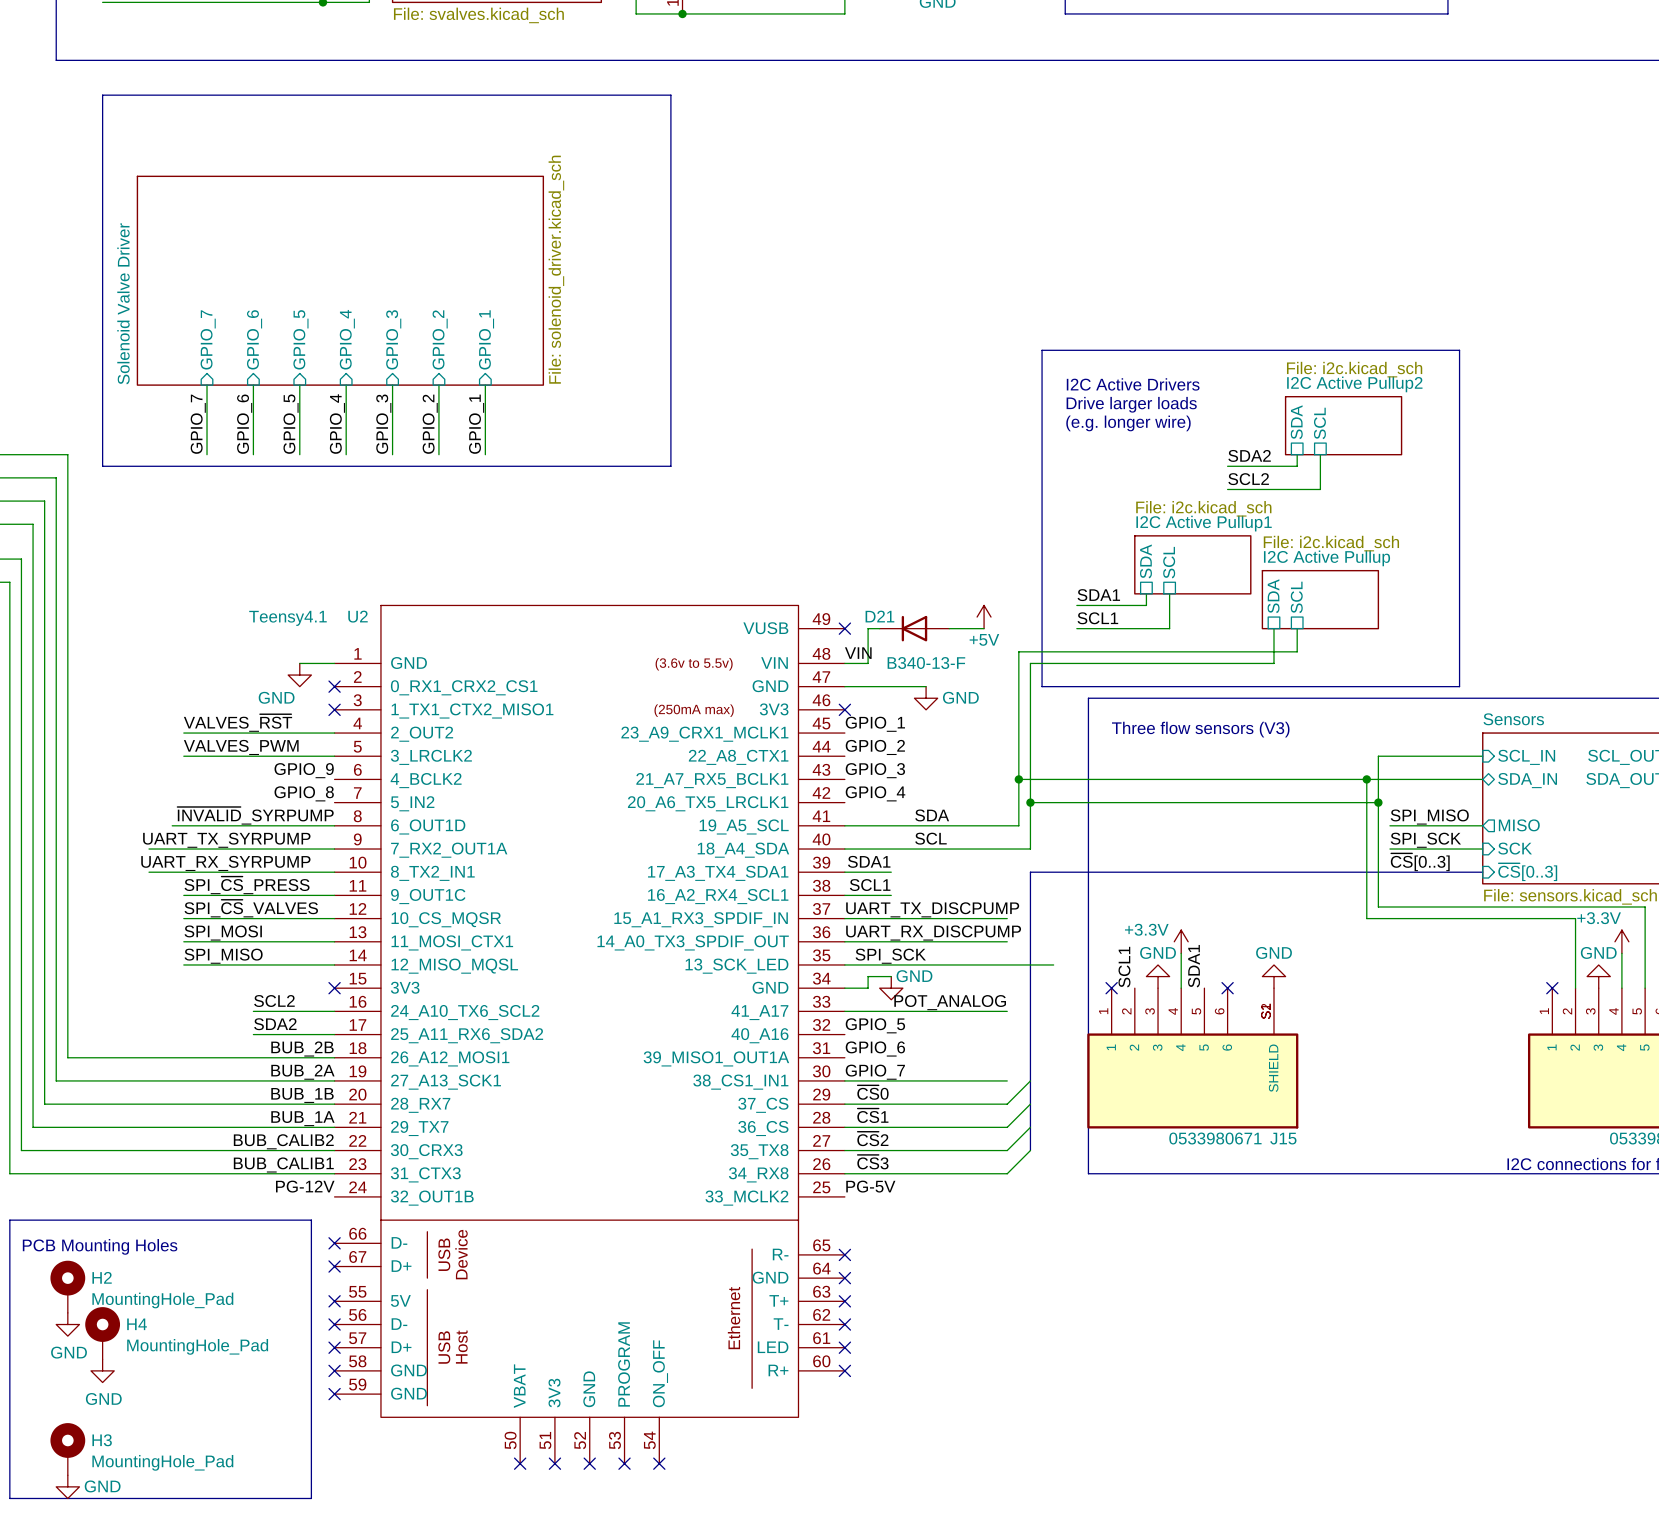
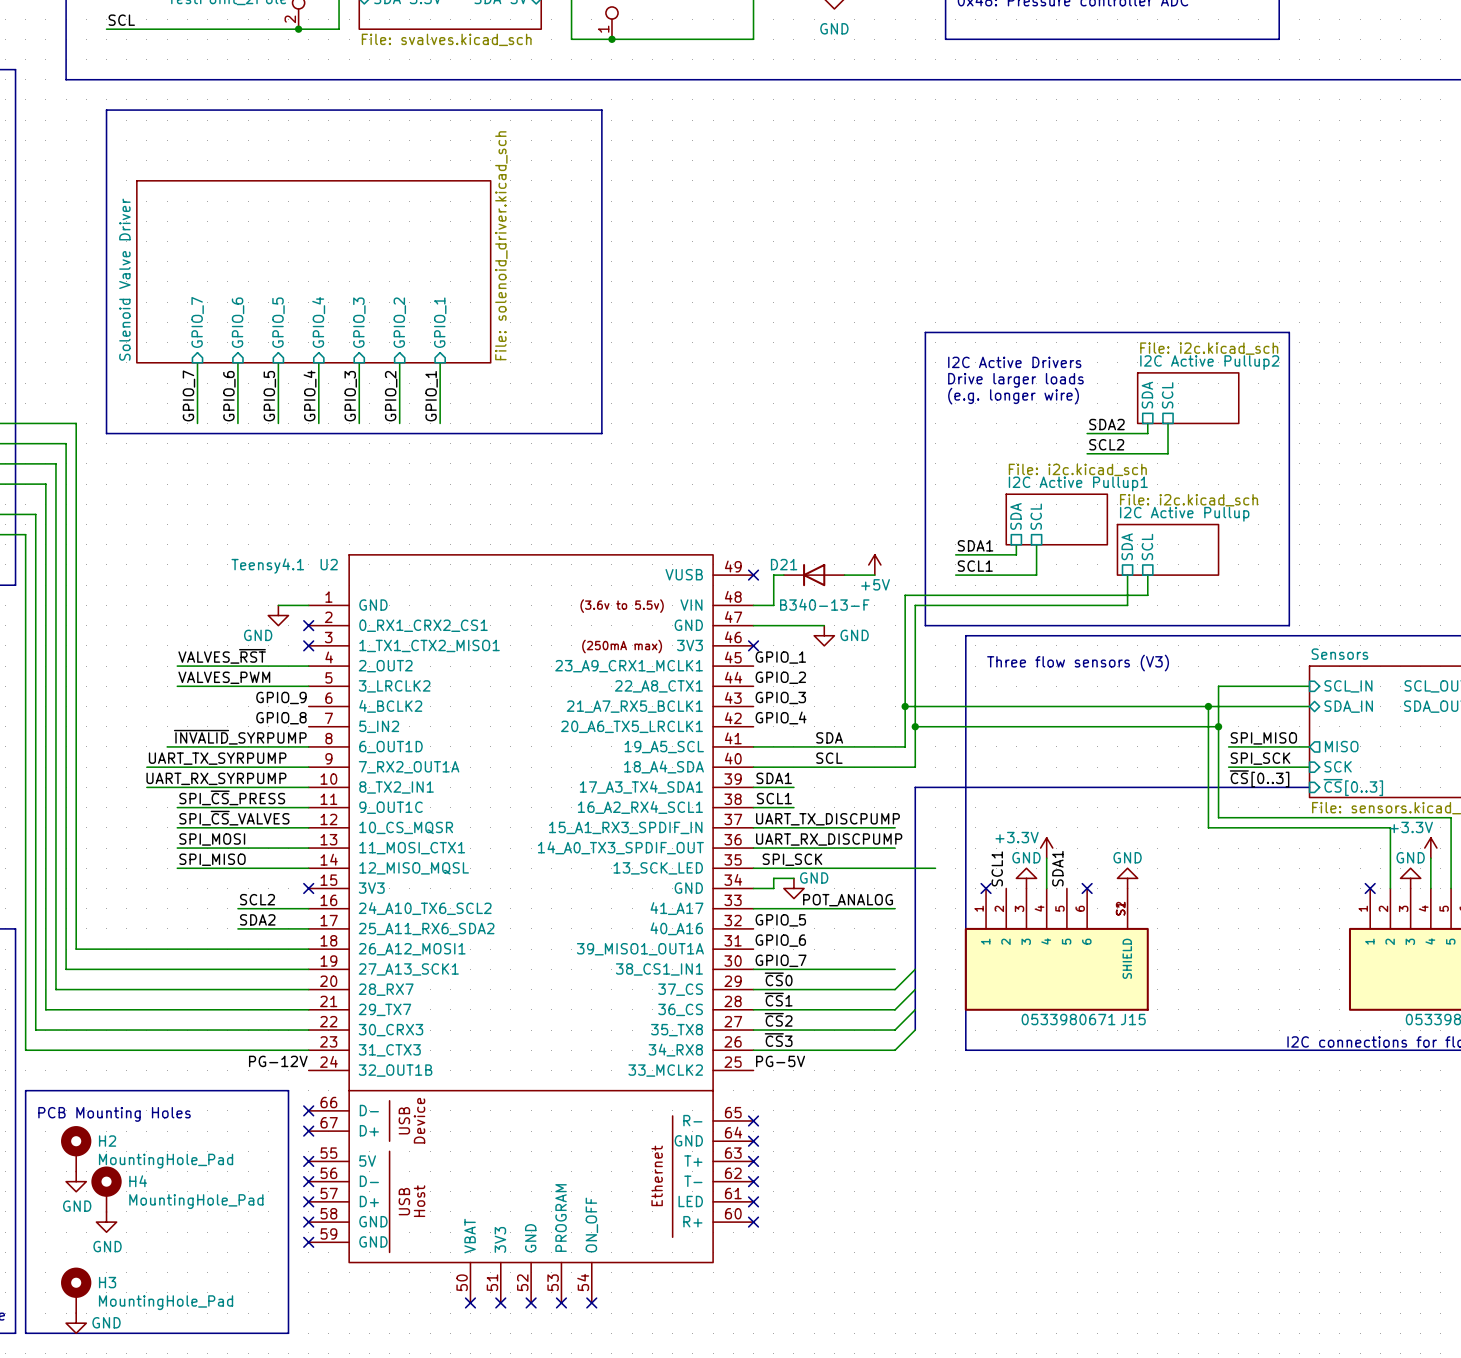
label: VIN (858, 653) -> none
label: BUB_2B (302, 1049) -> none
label: BUB_2A (302, 1072) -> none
label: BUB_1B (302, 1095) -> none
label: BUB_1A (302, 1118) -> none
label: BUB_CALIB2 (283, 1141) -> none
label: BUB_CALIB1 (283, 1164) -> none

